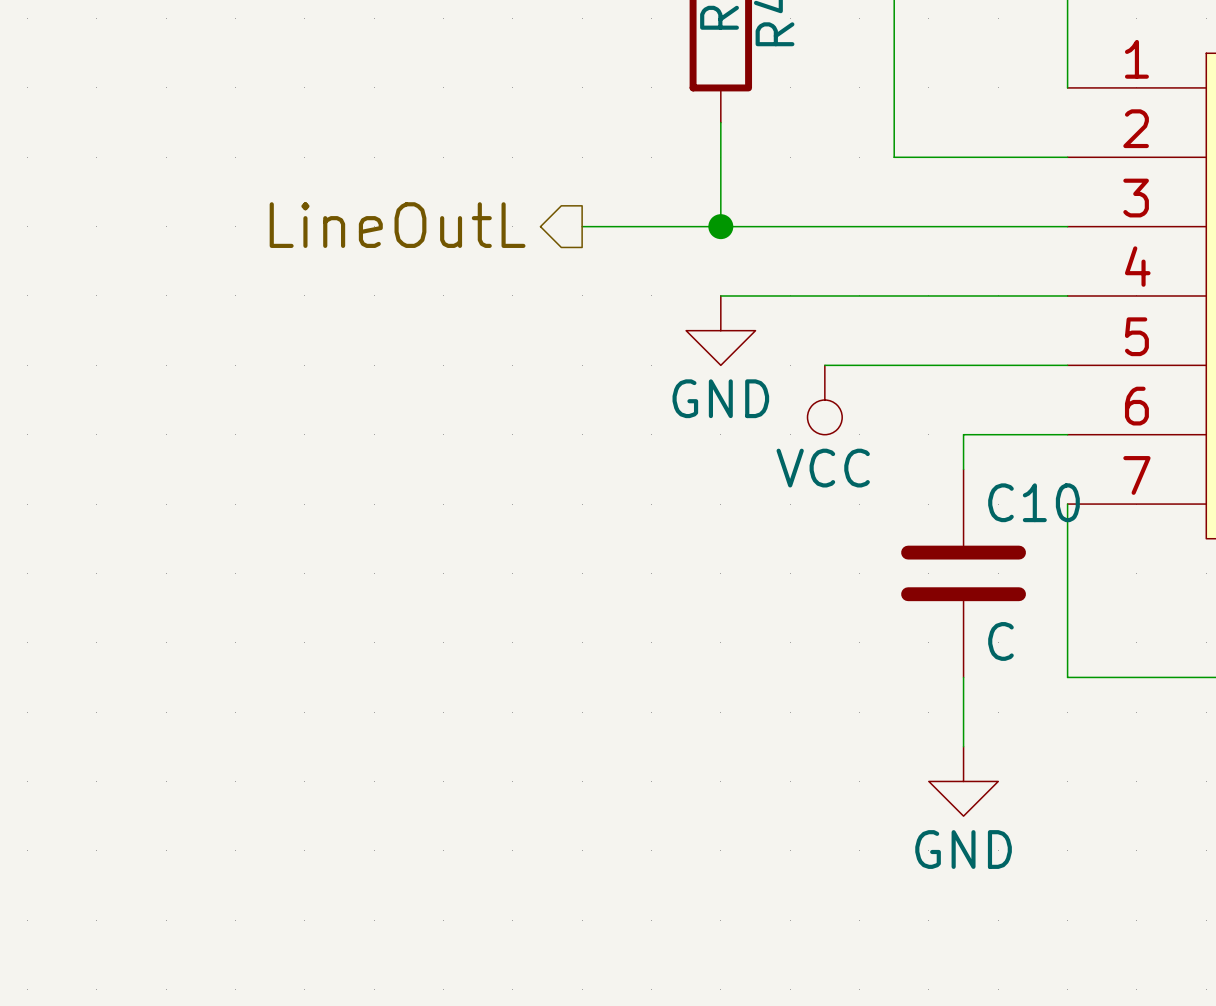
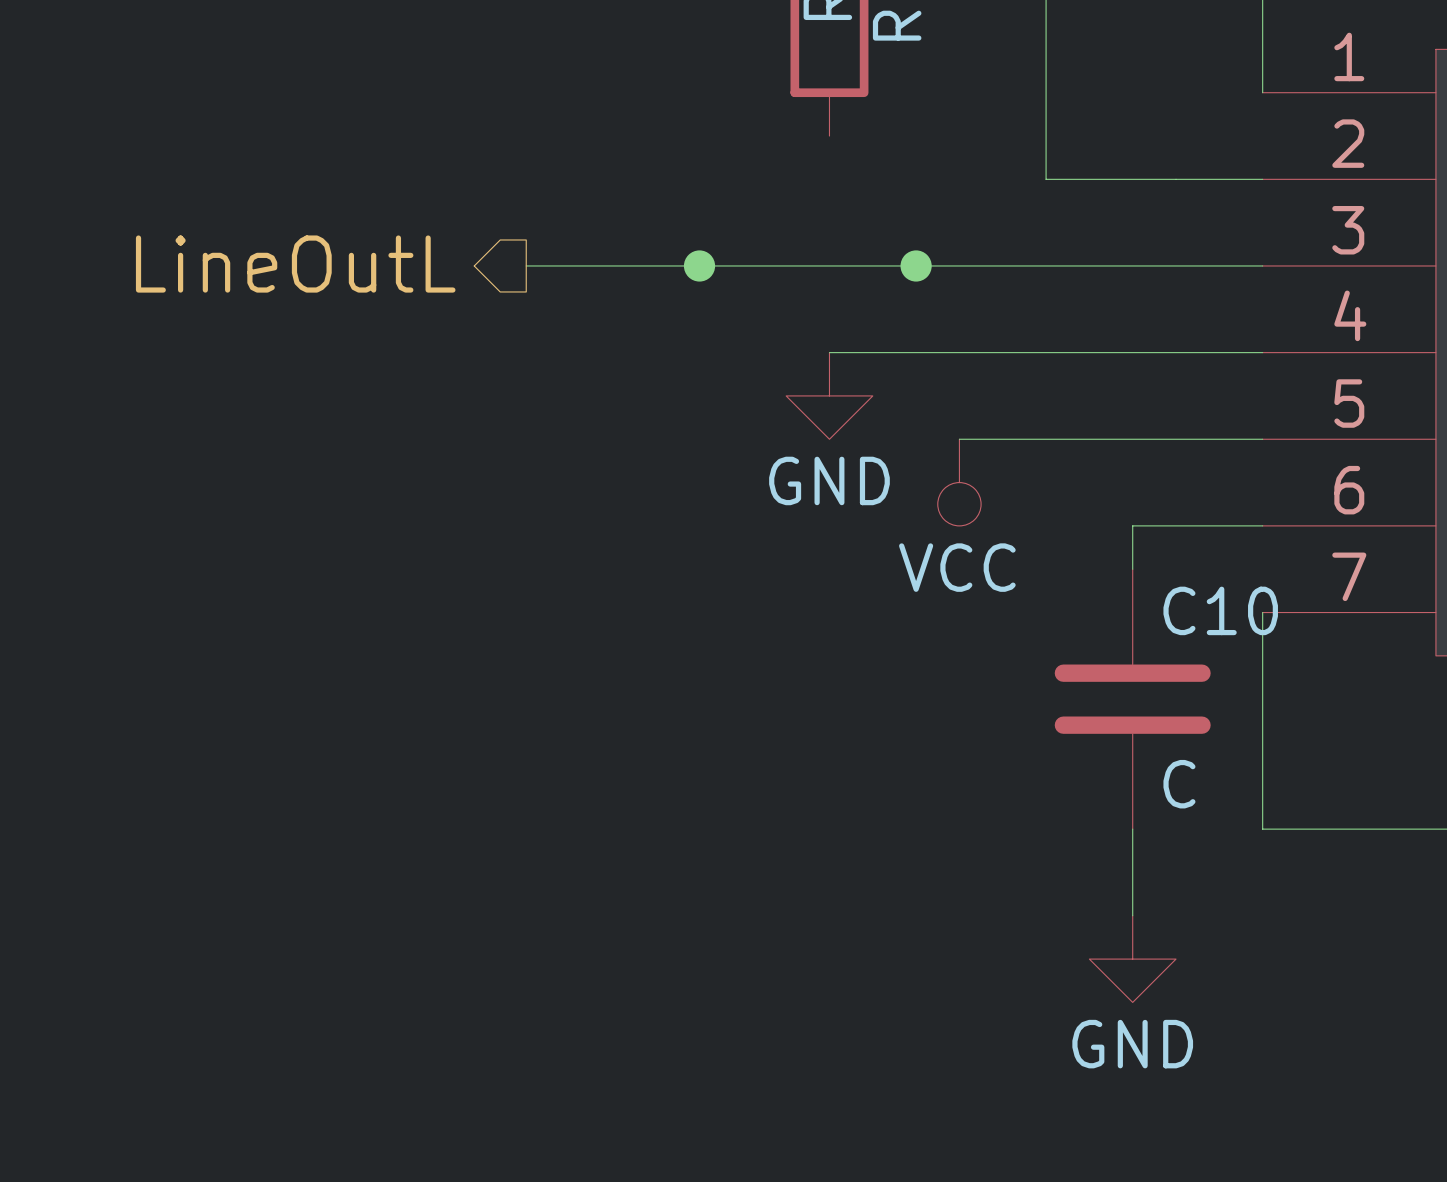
wire: (720, 122) (720, 226) -> none
hierarchical label position: LineOutL (397, 225) -> LineOutL (295, 264)
wire: none -> (526, 265) (656, 265)
junction: none -> (699, 265)
junction: (720, 226) -> none
junction: none -> (916, 265)

